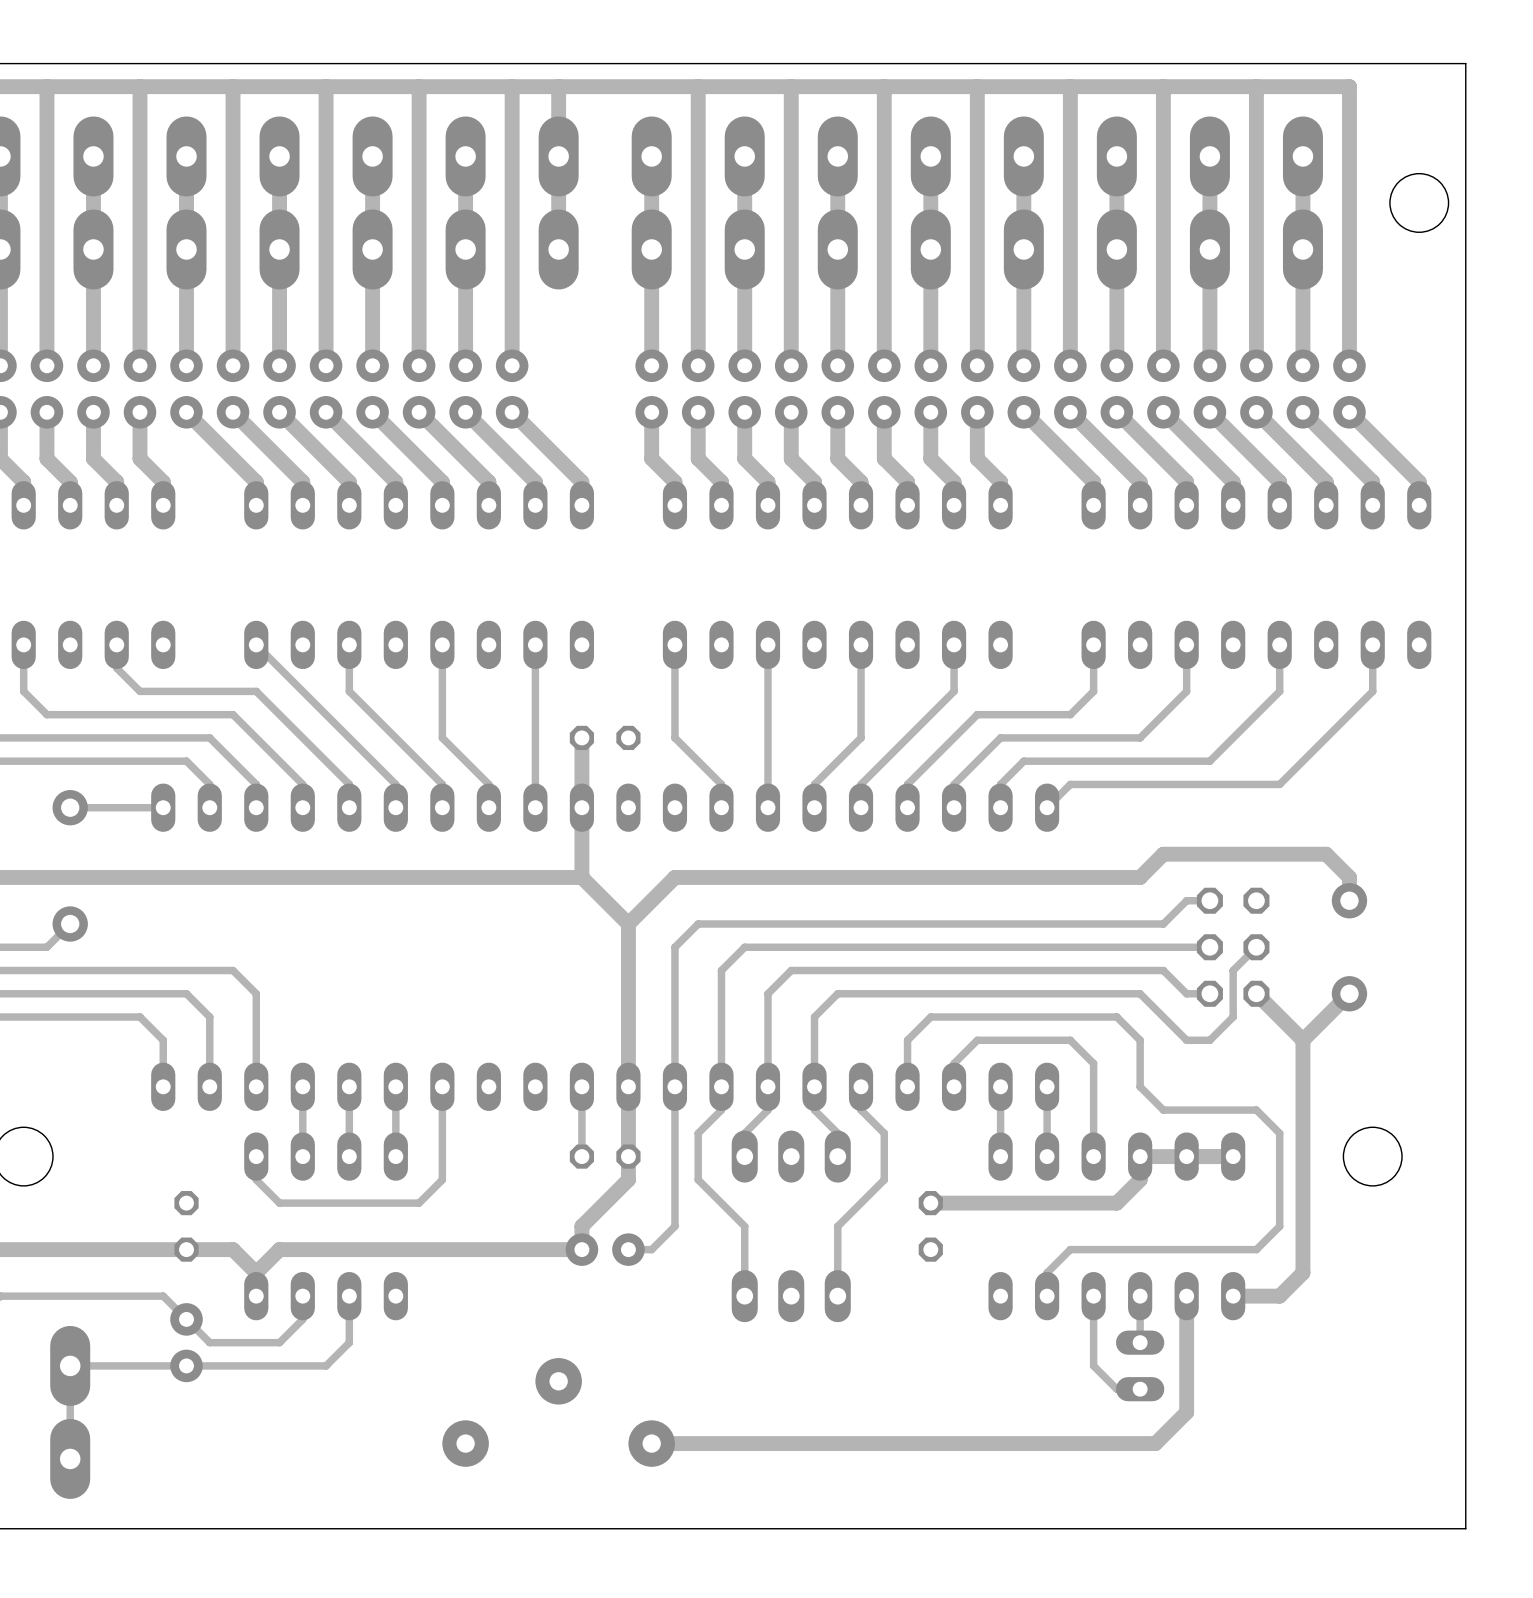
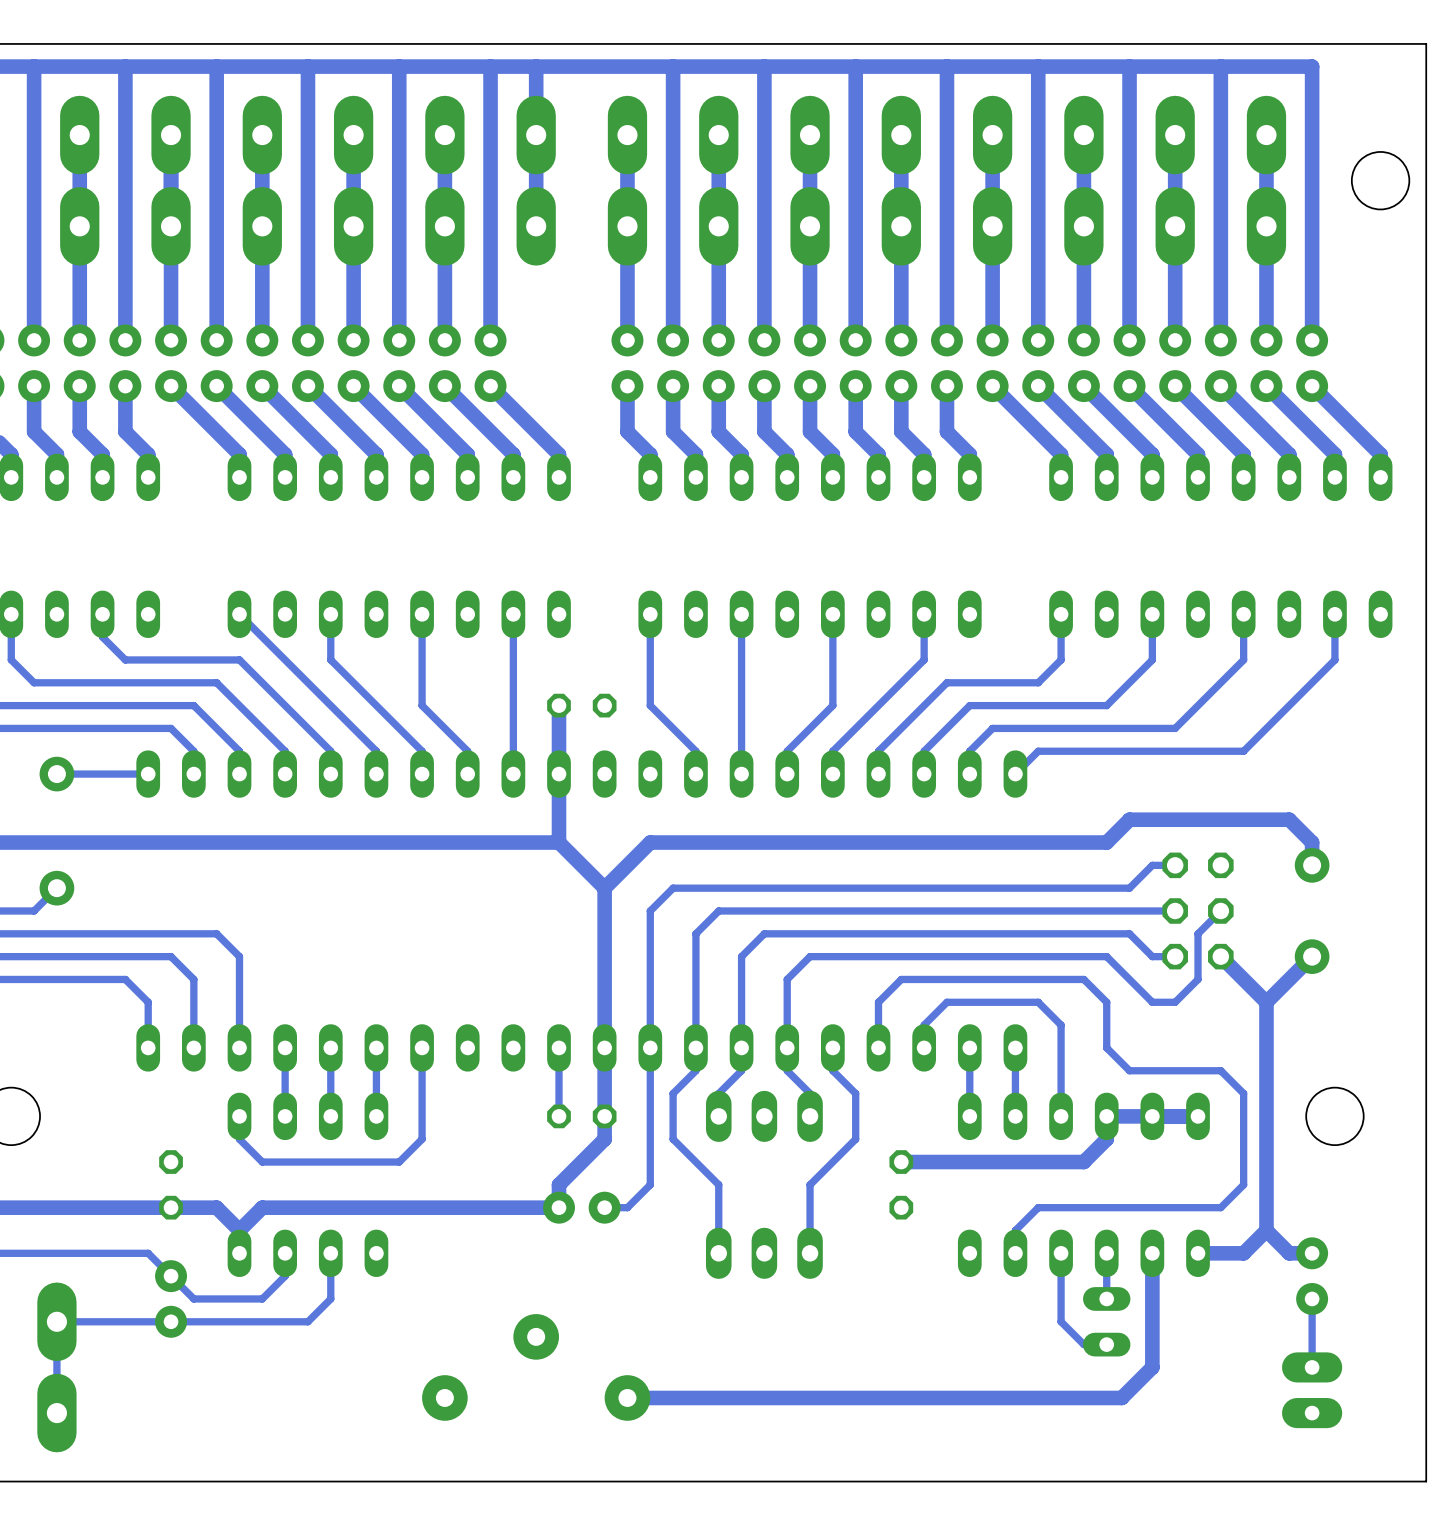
track: none -> (1266, 1230) (1289, 1253) (1312, 1253)
part: none -> (1312, 1276)
track: none -> (1312, 1298) (1312, 1367)
part: none -> (1312, 1390)

